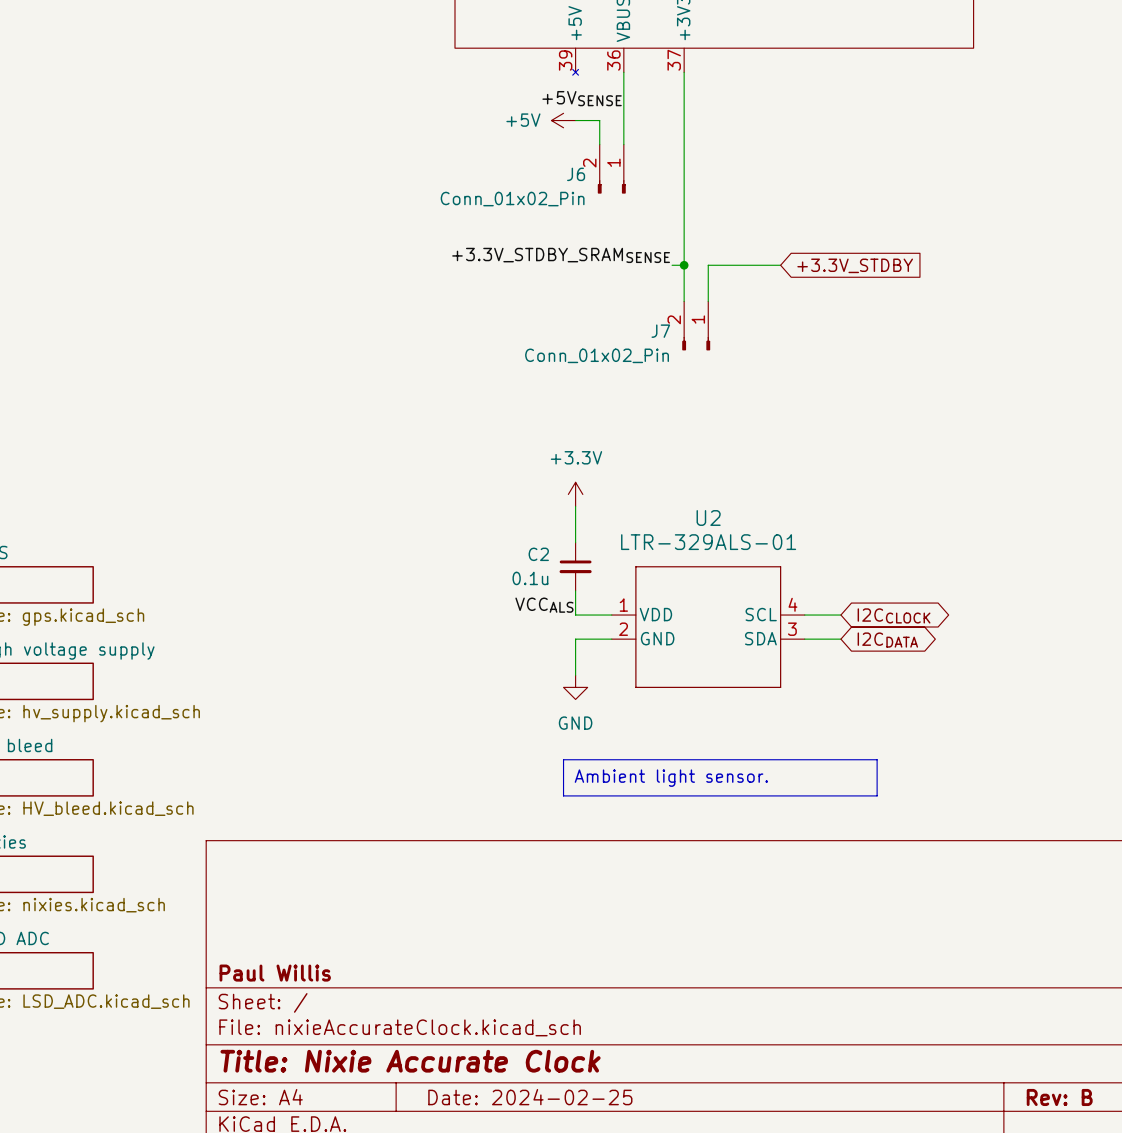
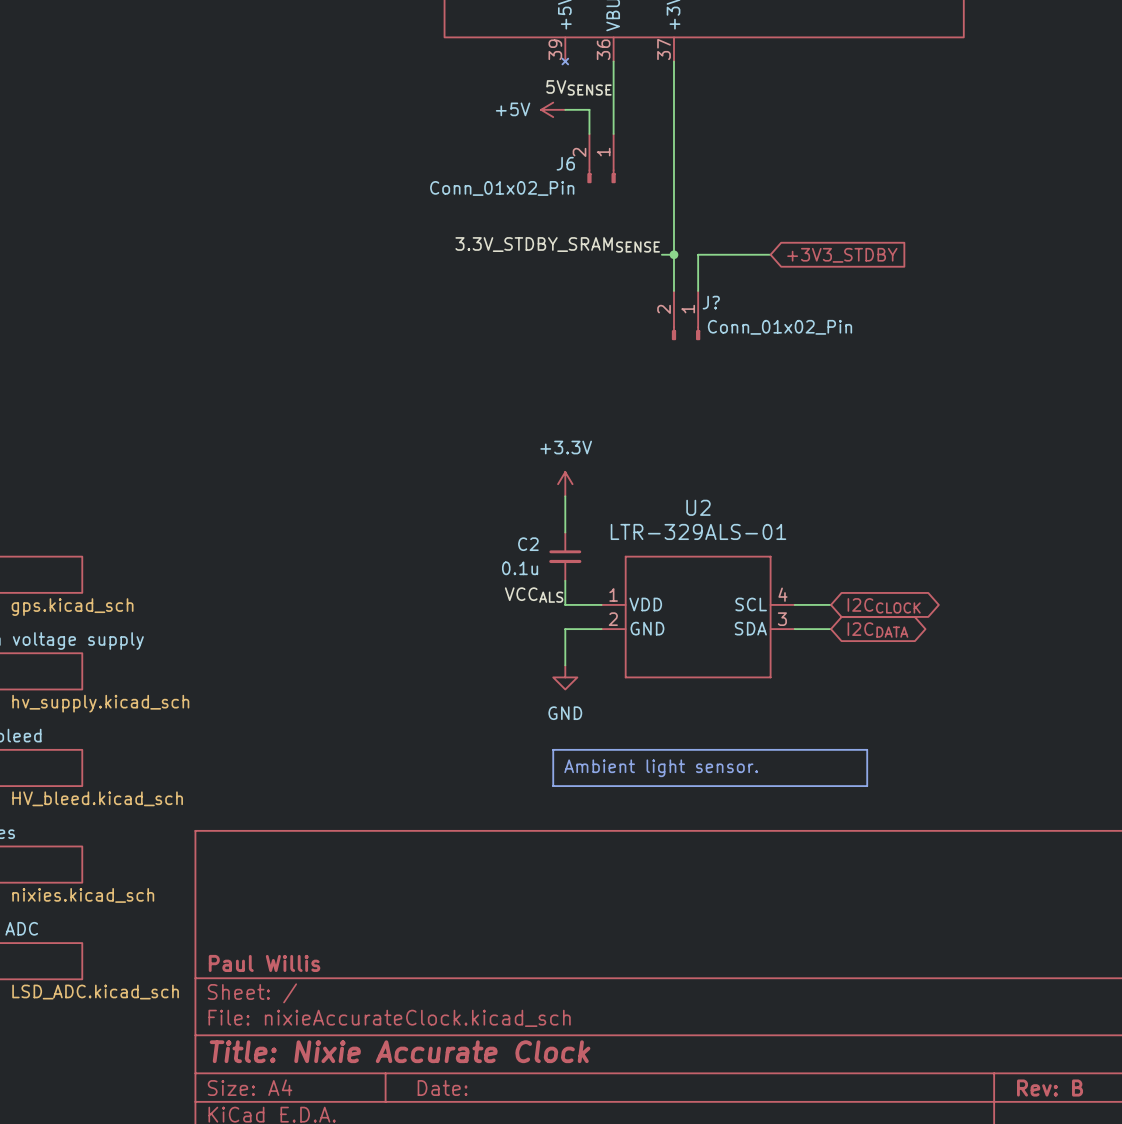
label: +5VSENSE (582, 98) -> 5VSENSE (578, 87)
label: +3.3V_STDBY_SRAMSENSE (561, 255) -> 3.3V_STDBY_SRAMSENSE (557, 244)
global label: +3.3V_STDBY (855, 265) -> +3V3_STDBY (842, 255)
J7 name: J7 (660, 331) -> J? (711, 302)
J7 value position: Conn_01x02_Pin (597, 355) -> Conn_01x02_Pin (779, 327)
title block: Date: 2024-02-25 (530, 1097) -> Date: (442, 1088)

